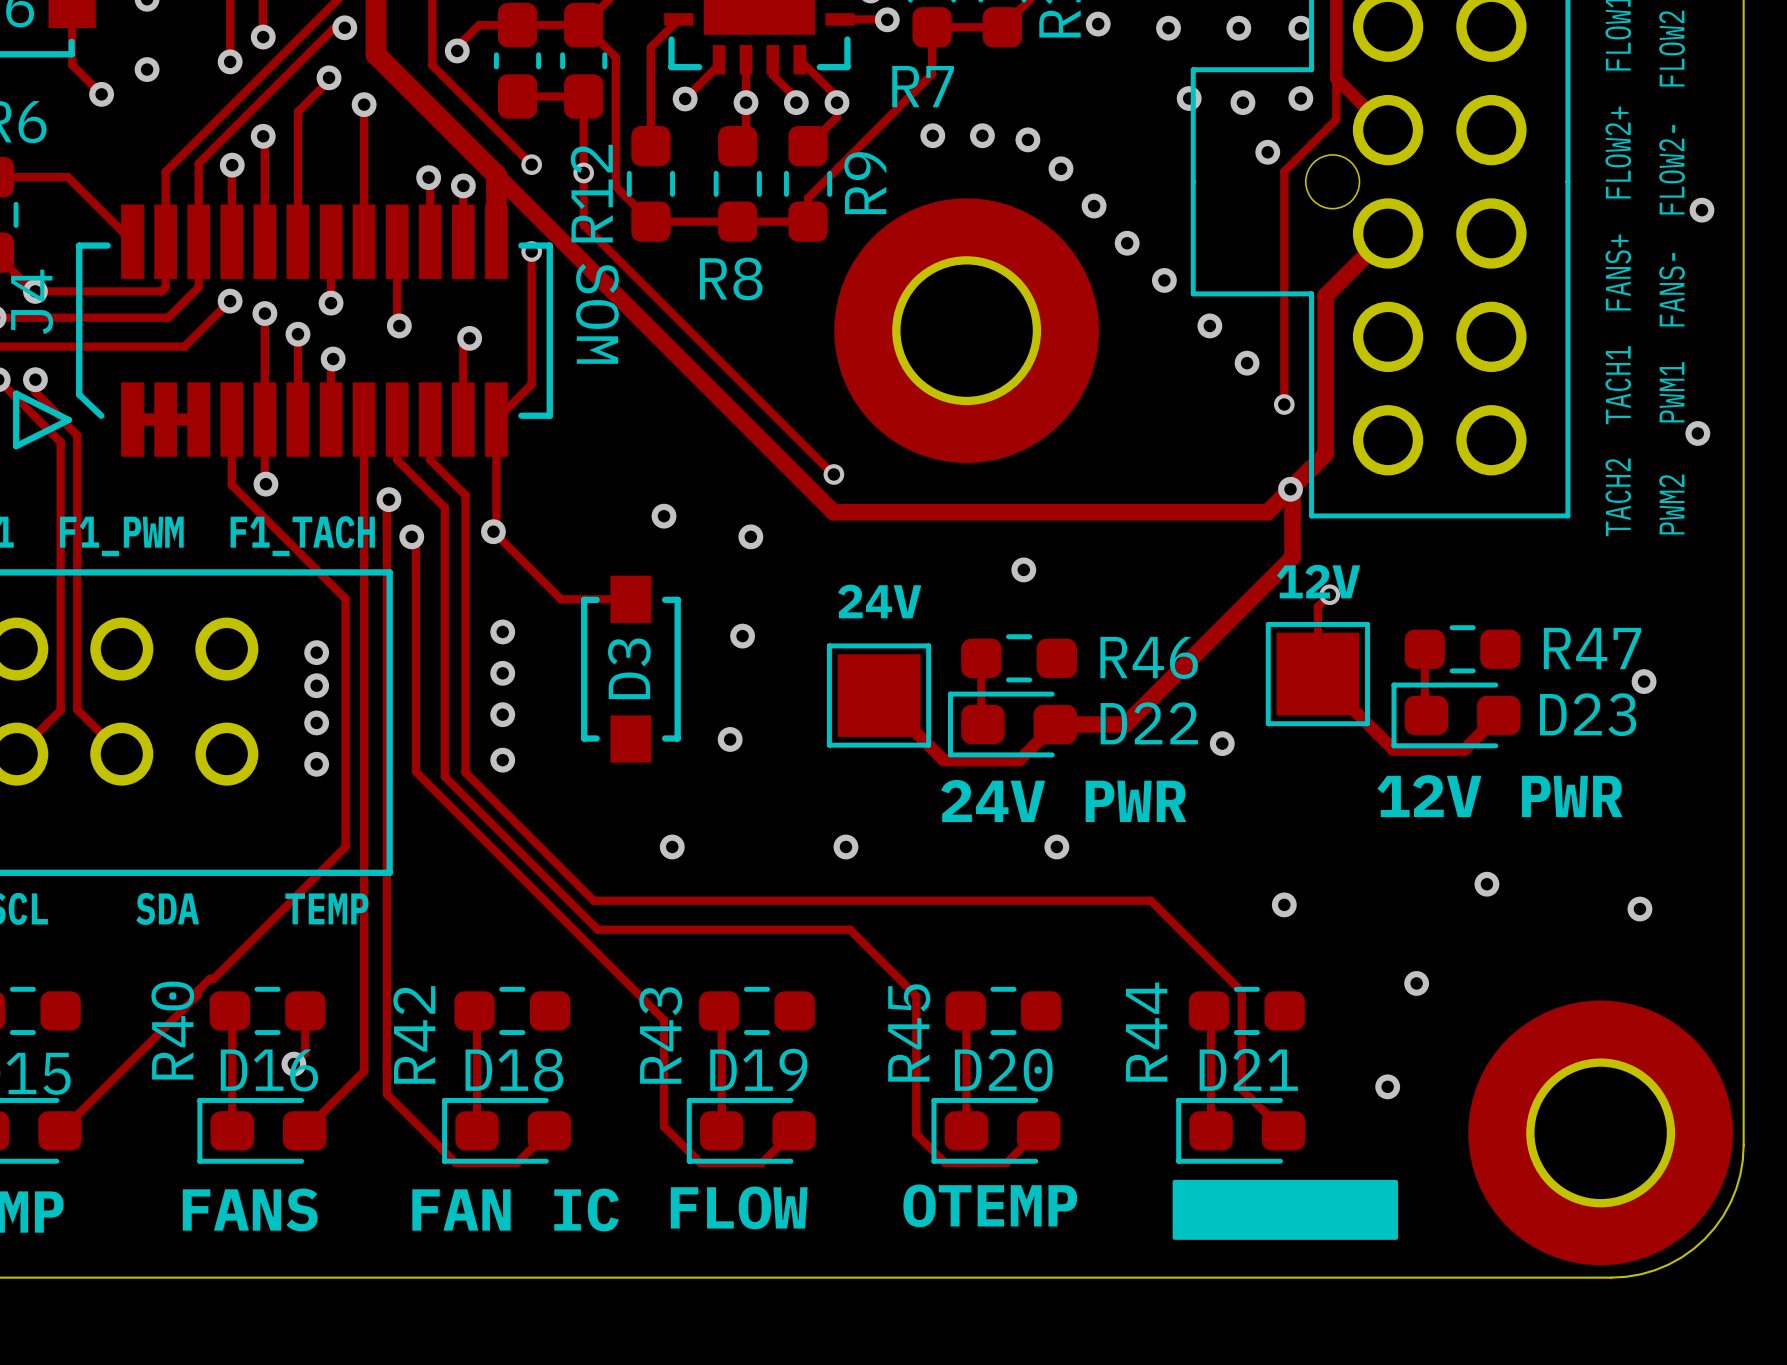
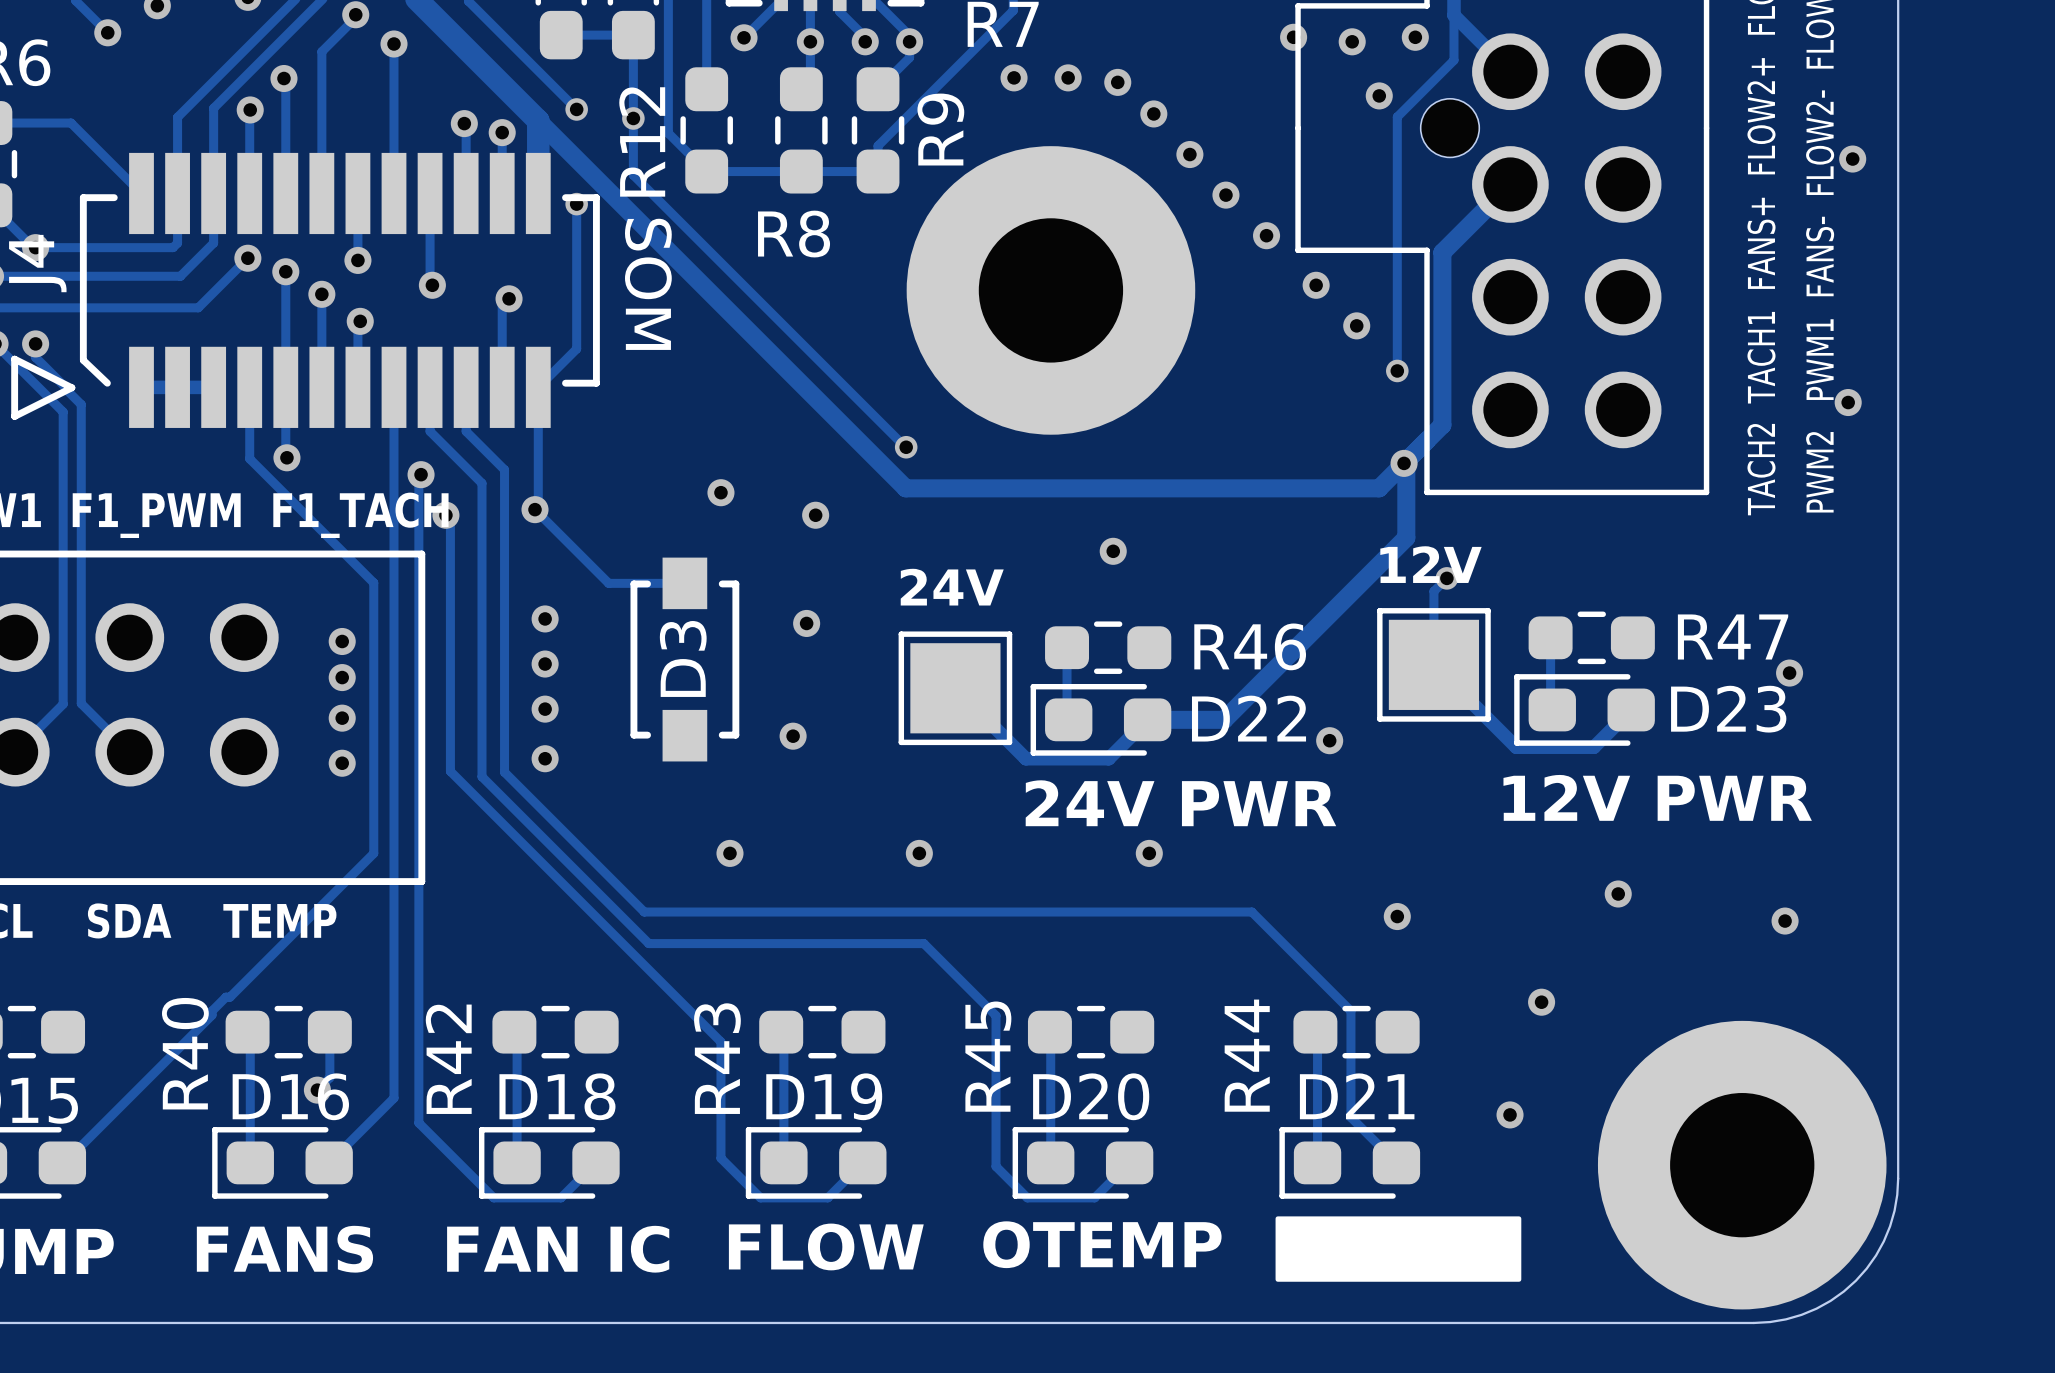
part value: 12V (1318, 581) -> none
text: none -> 12V (1431, 564)
part value: 24V (879, 601) -> none
text: none -> 24V (952, 587)

